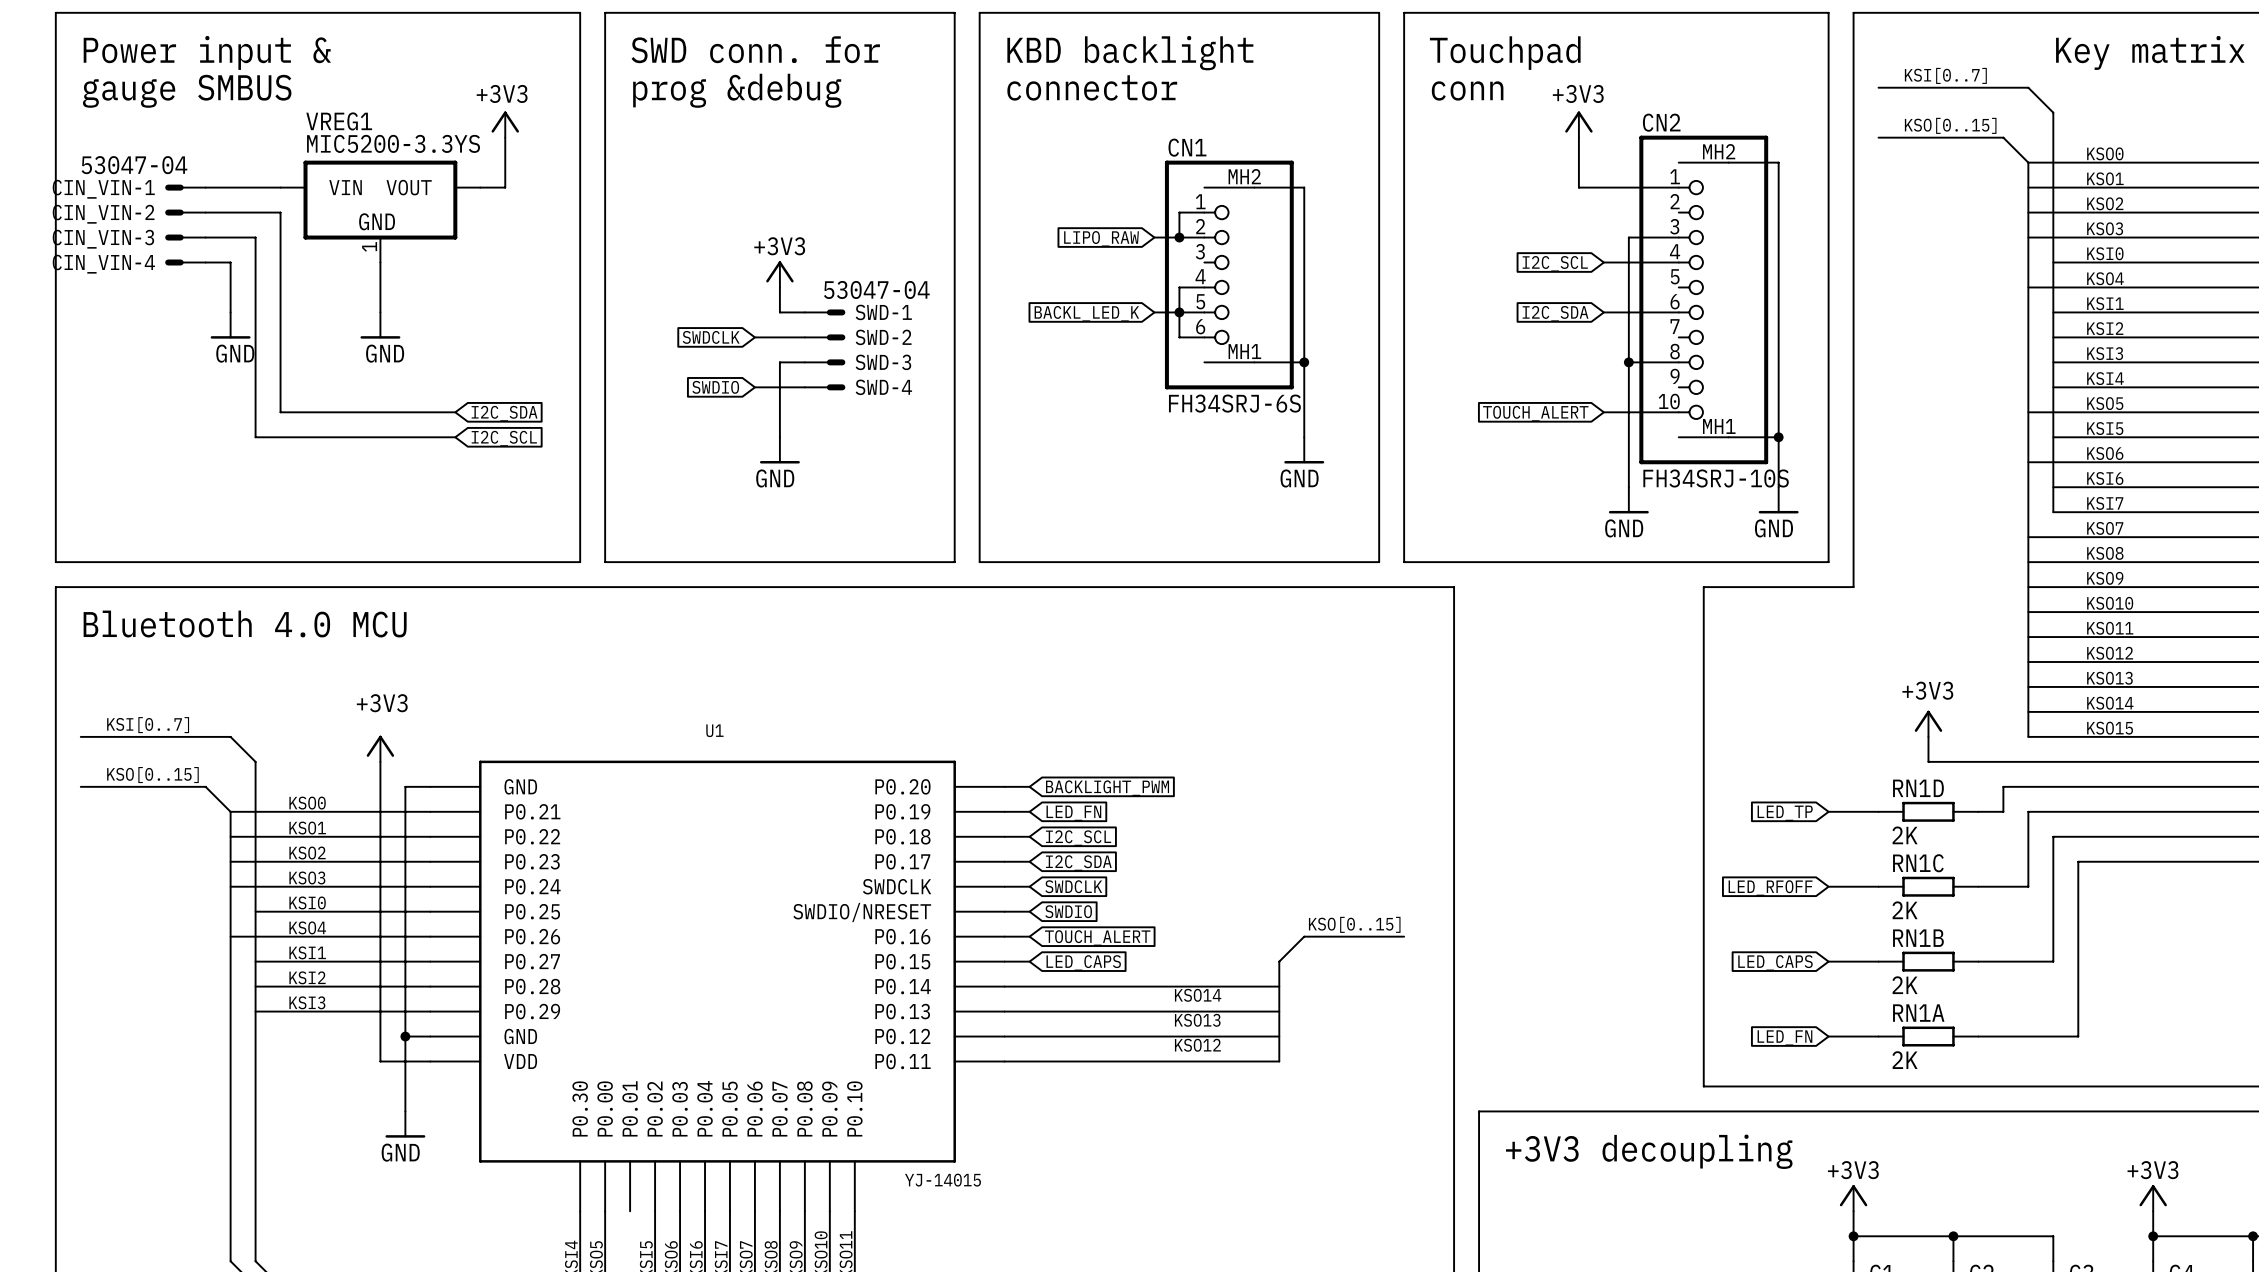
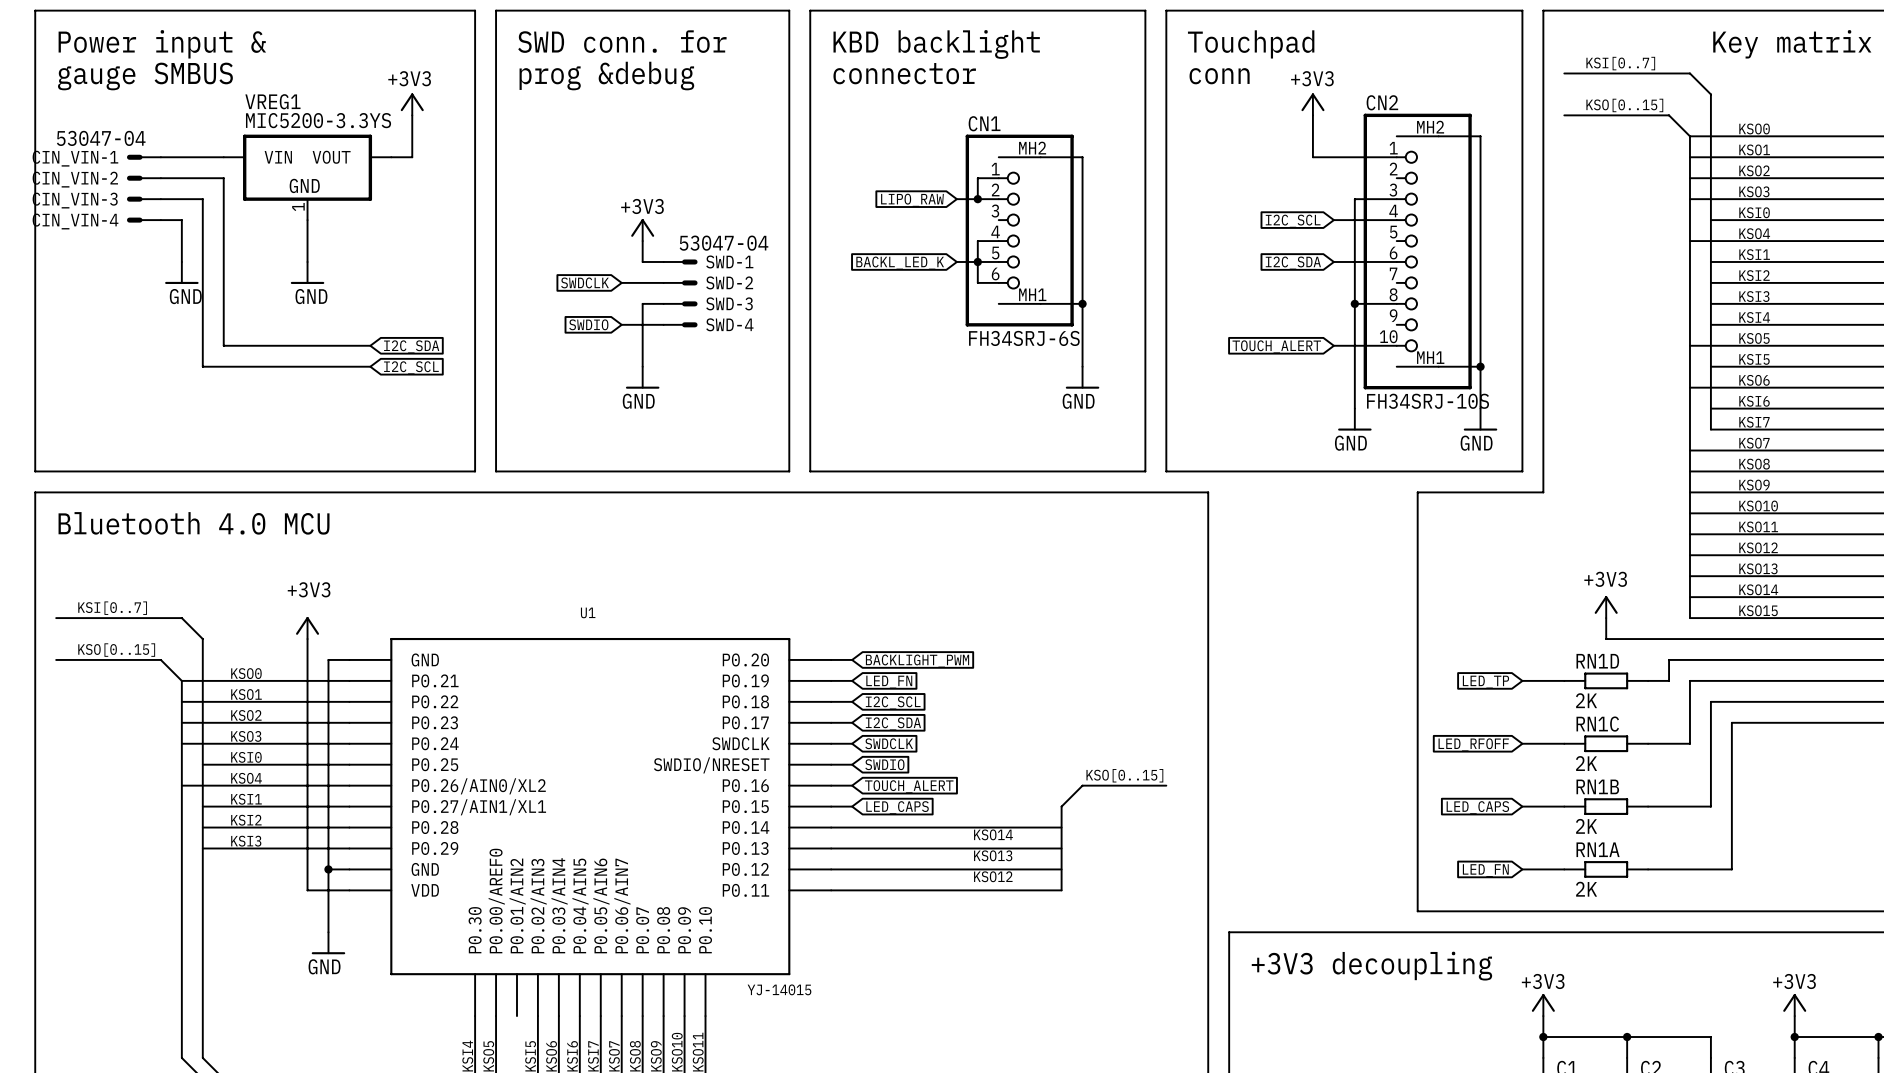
U1 symbol: [430, 760, 1005, 1212] -> [349, 637, 832, 1017]

